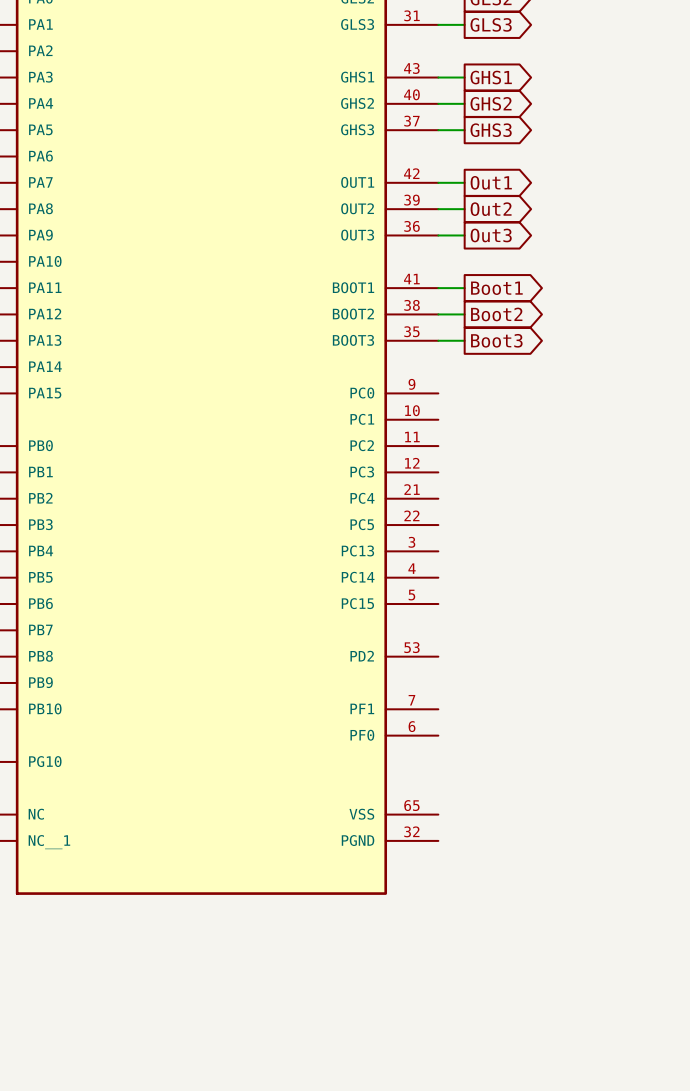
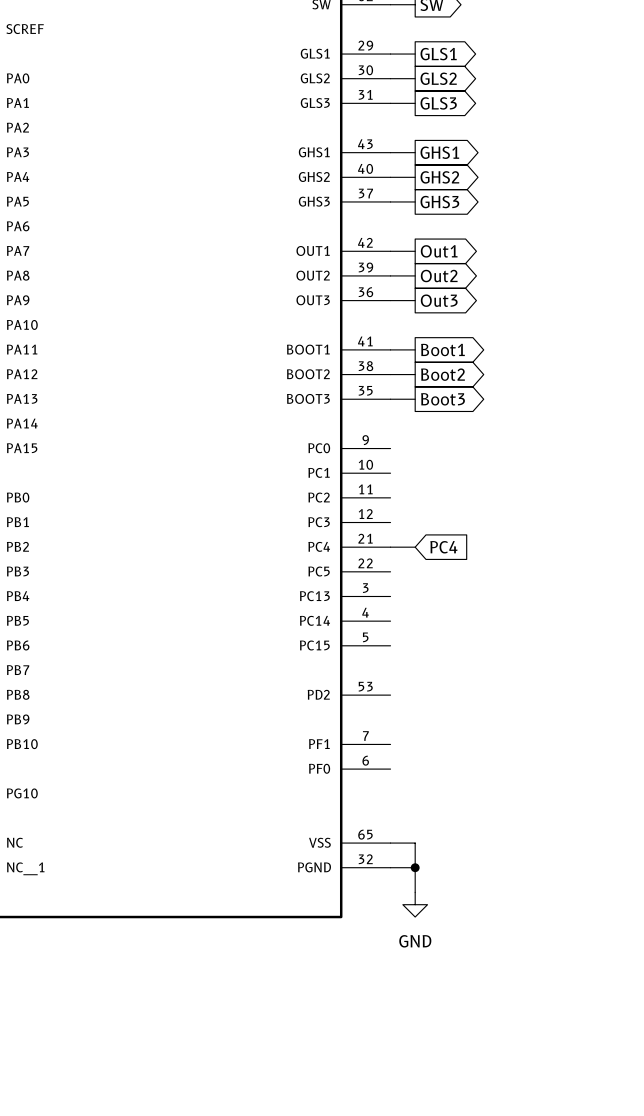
wire: none -> (390, 547) (415, 547)
global label: none -> PC4 (443, 547)
wire: none -> (390, 843) (415, 843) (415, 892)
wire: none -> (390, 867) (415, 867)
junction: none -> (415, 867)
power symbol: none -> GND (415, 904)

